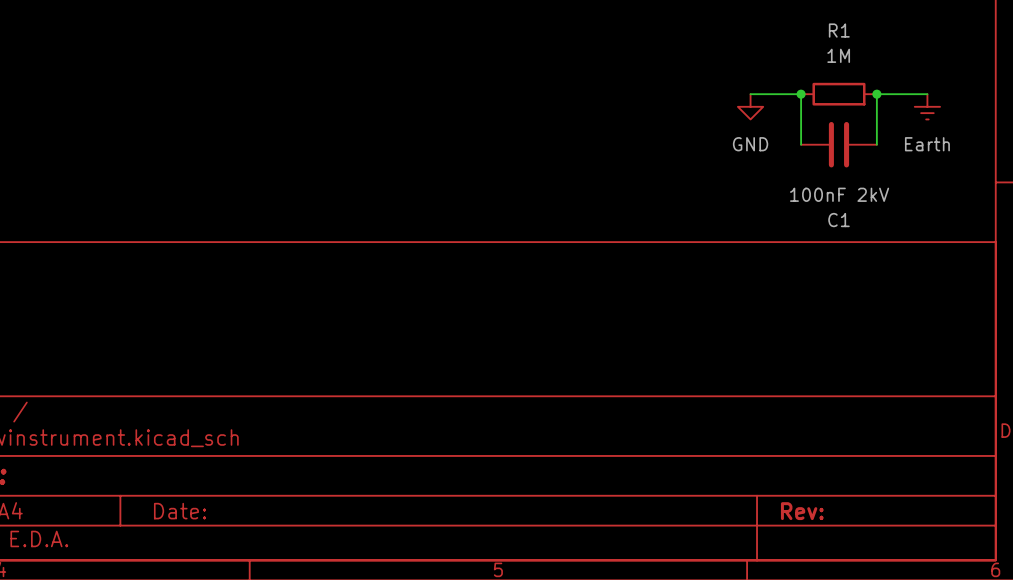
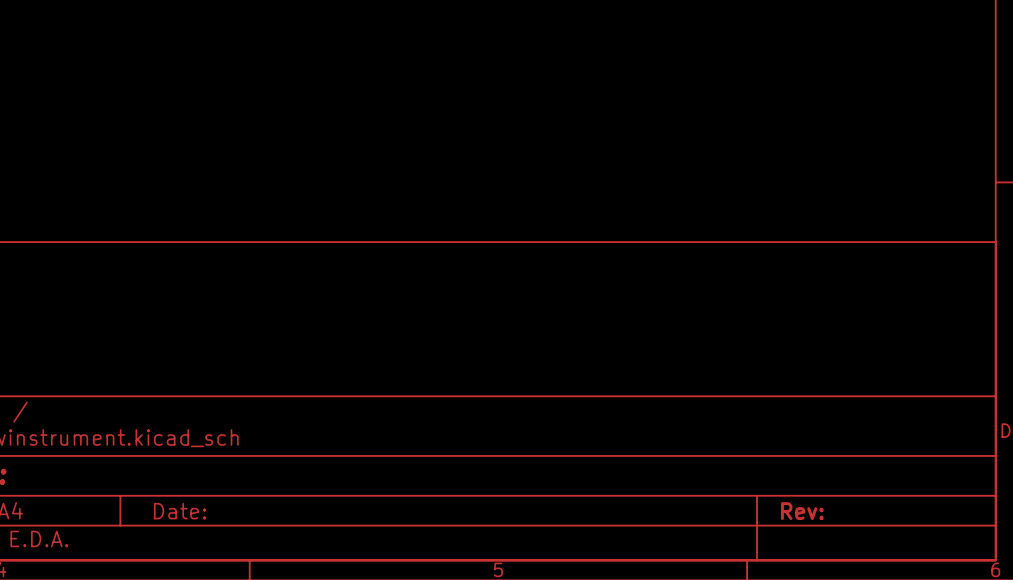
wire: (750, 94) (801, 94) (801, 144) -> none
junction: (801, 94) -> none
R1: 1M (838, 94) -> none
junction: (876, 94) -> none
wire: (927, 94) (876, 94) (876, 144) -> none
power symbol: GND (750, 106) -> none
power symbol: Earth (927, 106) -> none
C1: 100nF 2kV (838, 144) -> none

